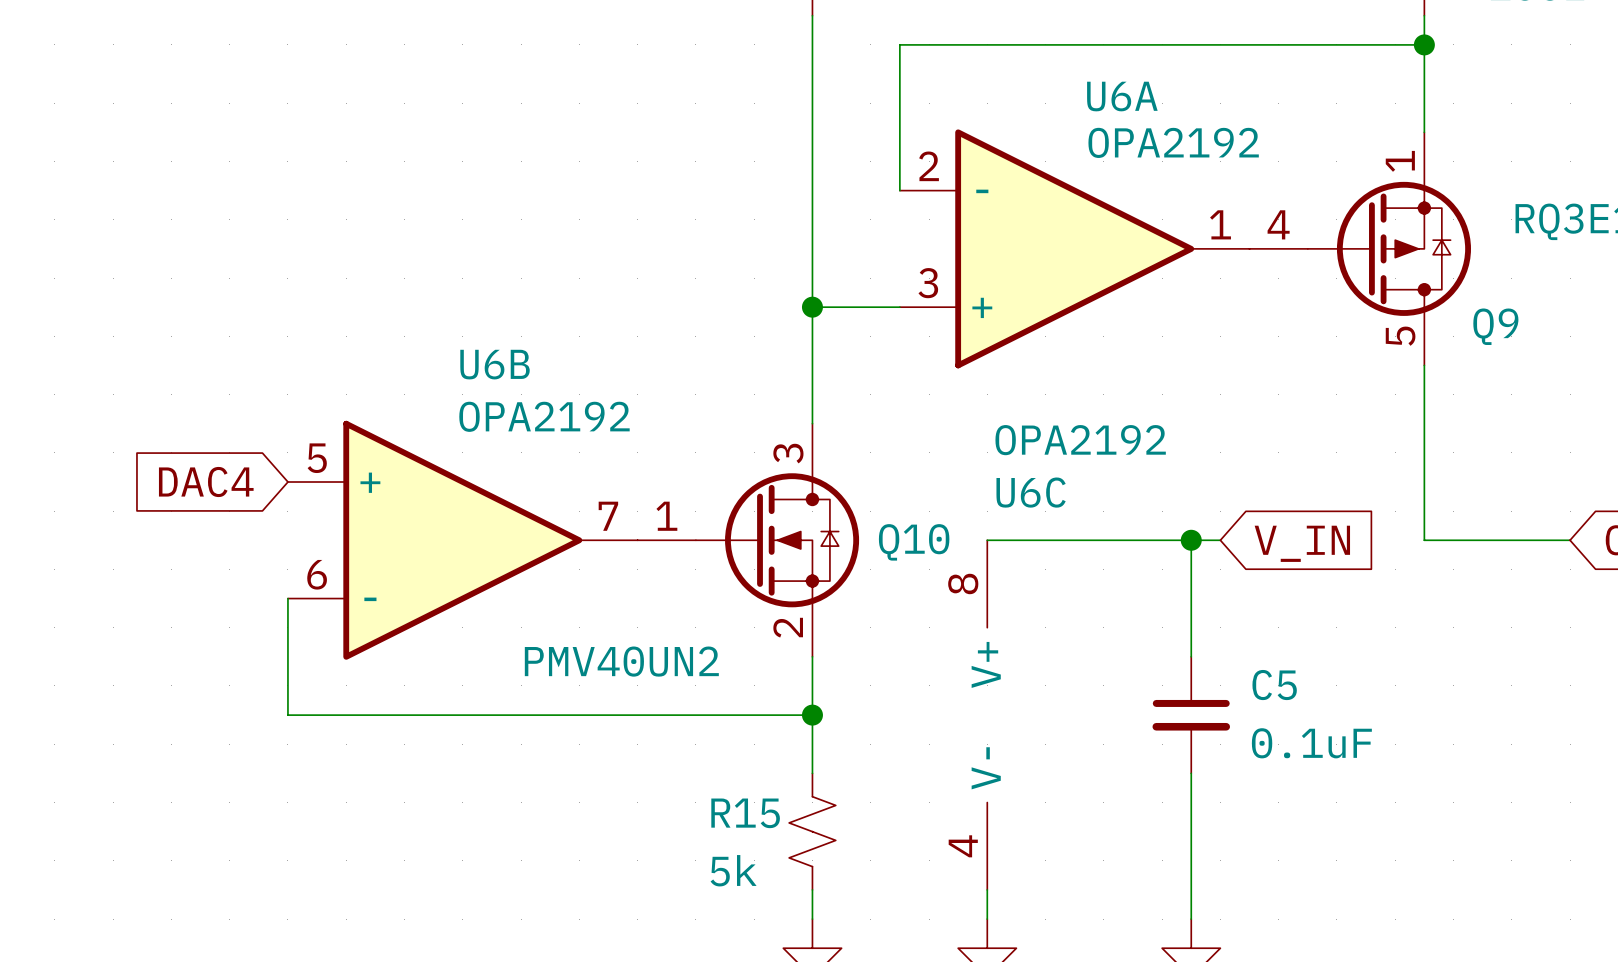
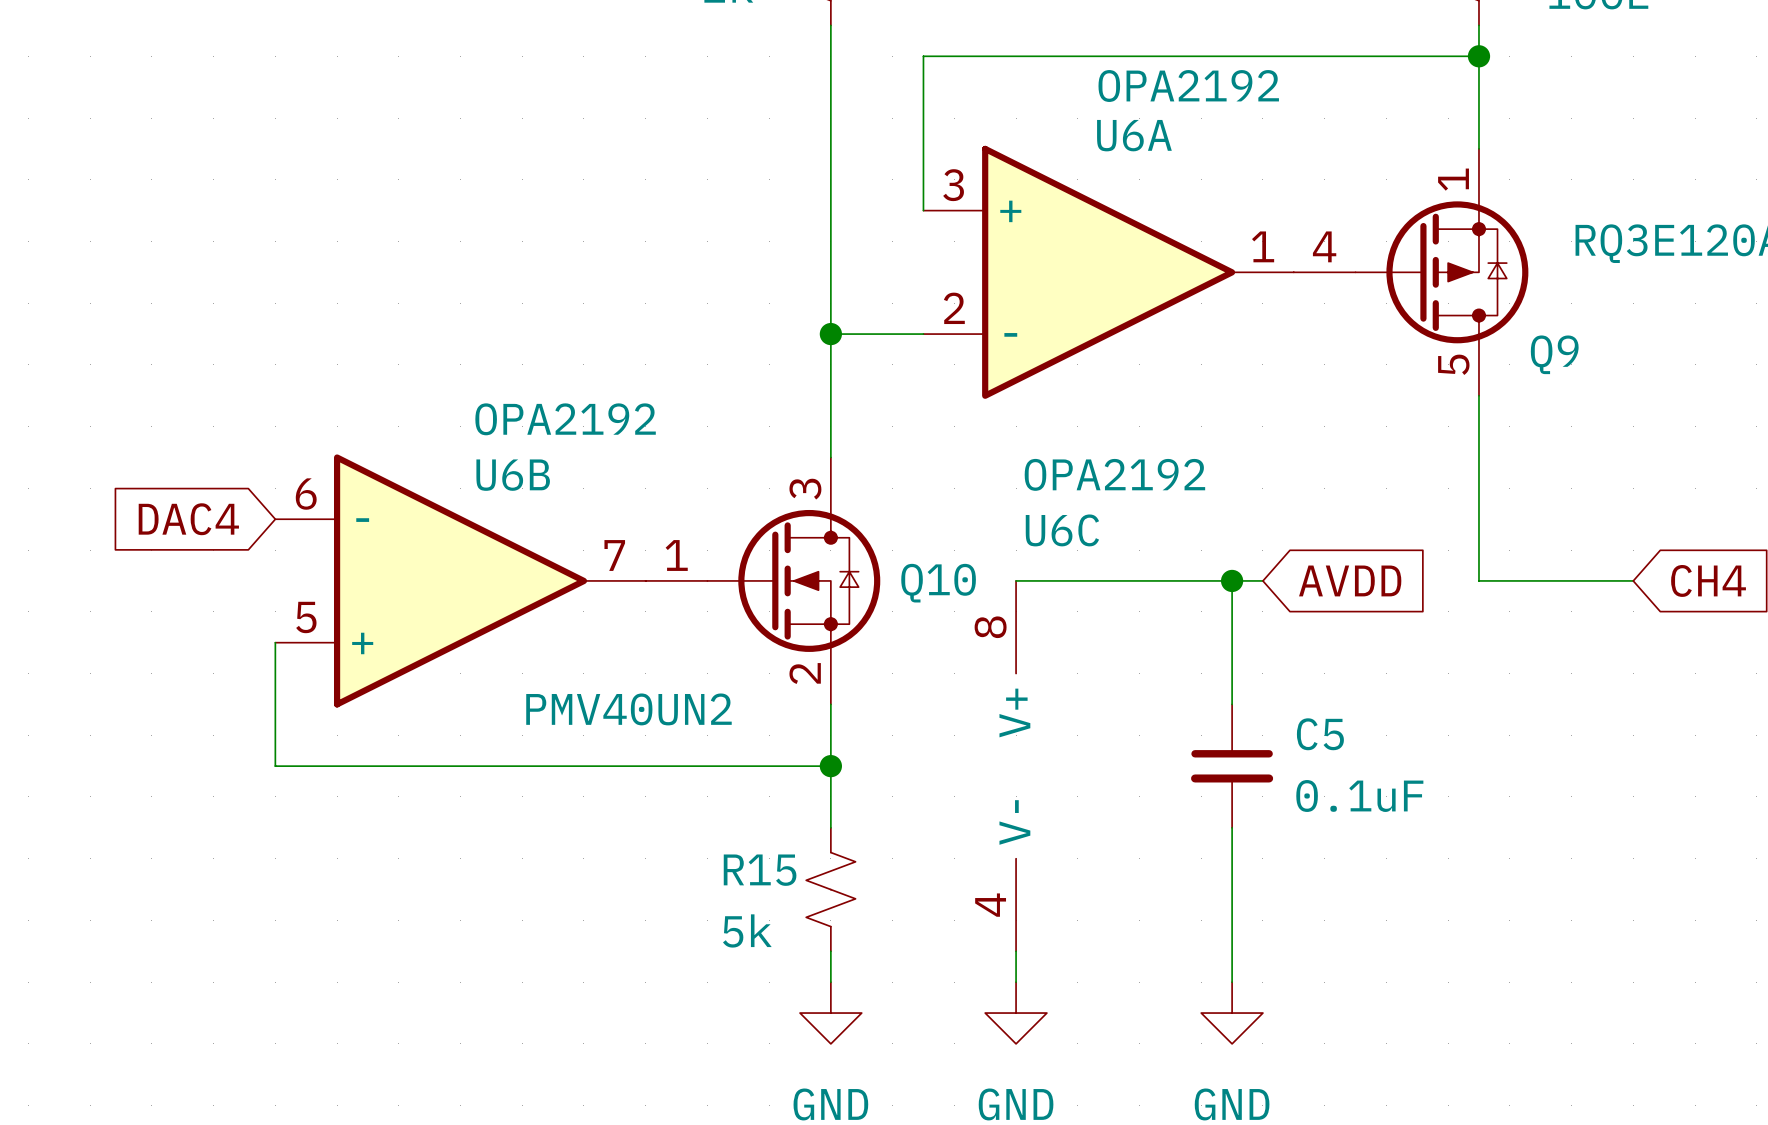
U6A value position: OPA2192 (1173, 142) -> OPA2192 (1188, 86)
U6A flip: as is (1074, 248) -> up-down (1108, 272)
U6B name position: U6B (495, 364) -> U6B (513, 475)
U6B flip: as is (462, 540) -> up-down (460, 580)
global label: V_IN (1302, 543) -> AVDD (1350, 580)

